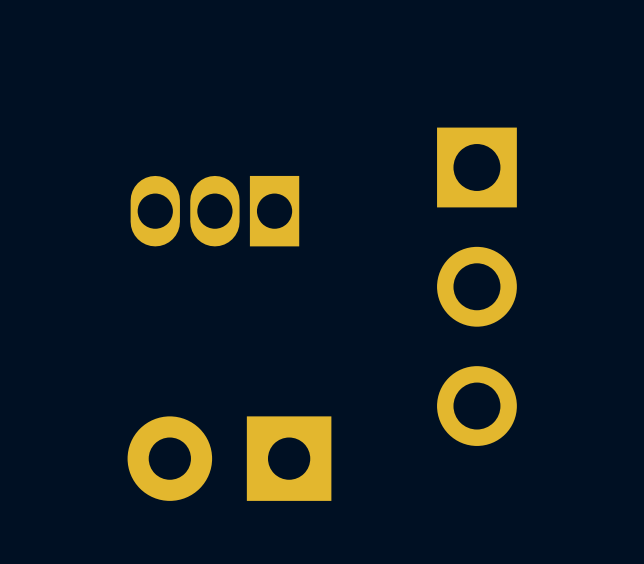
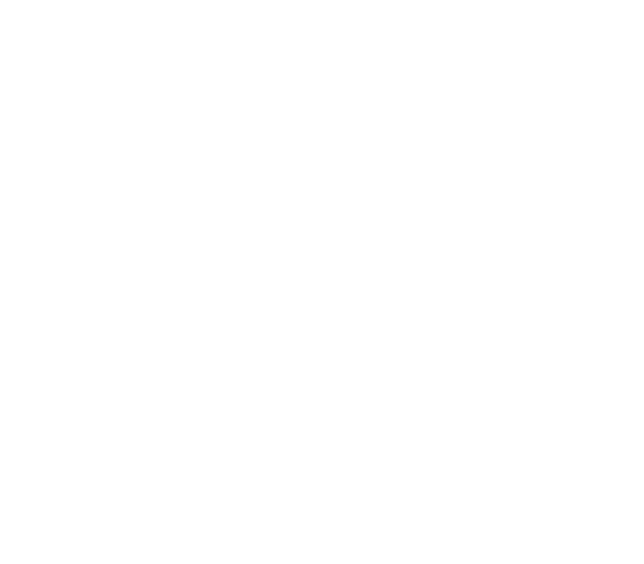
part: (214, 211) -> none
part: (476, 286) -> none
part: (229, 458) -> none

